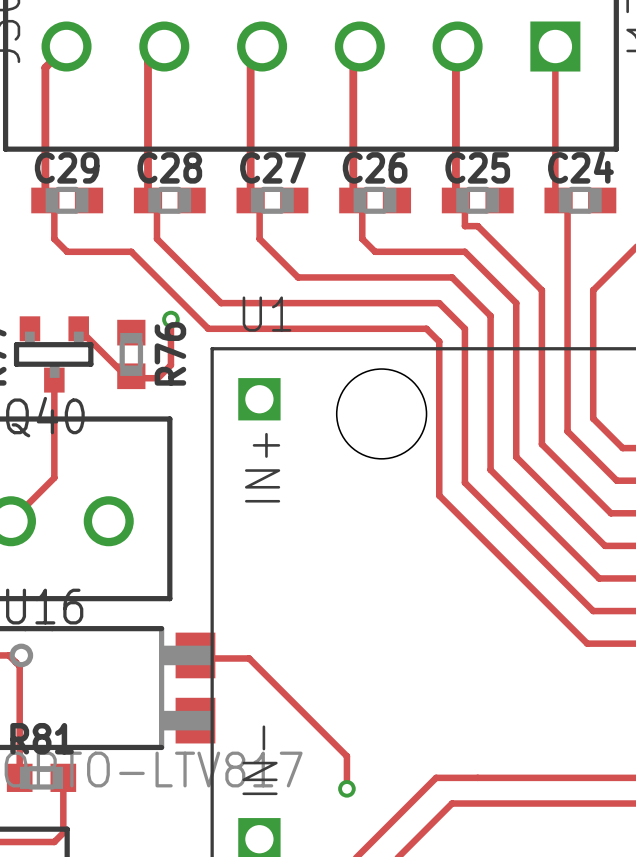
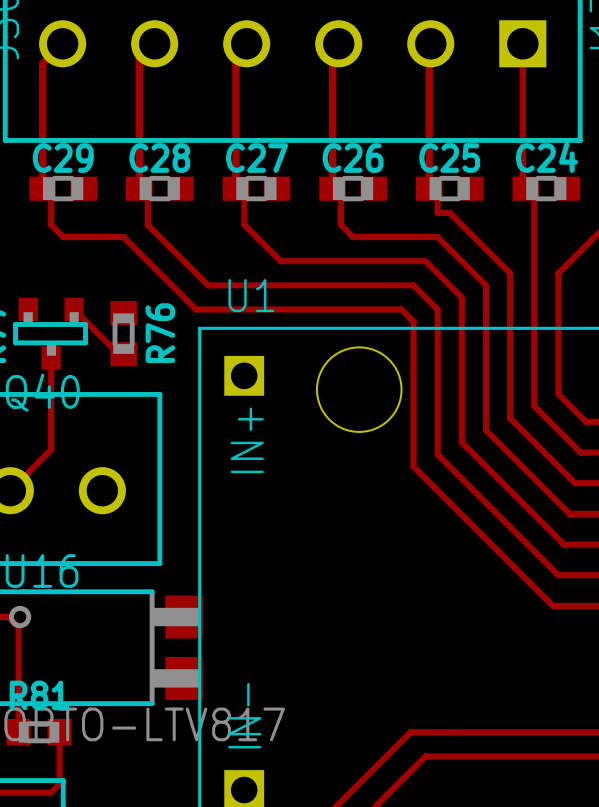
track: (170, 319) (170, 365) (157, 378) (133, 378) (131, 376) -> none
via: (170, 319) -> none
track: (195, 655) (198, 658) (249, 658) (346, 756) (346, 788) -> none
via: (346, 788) -> none

